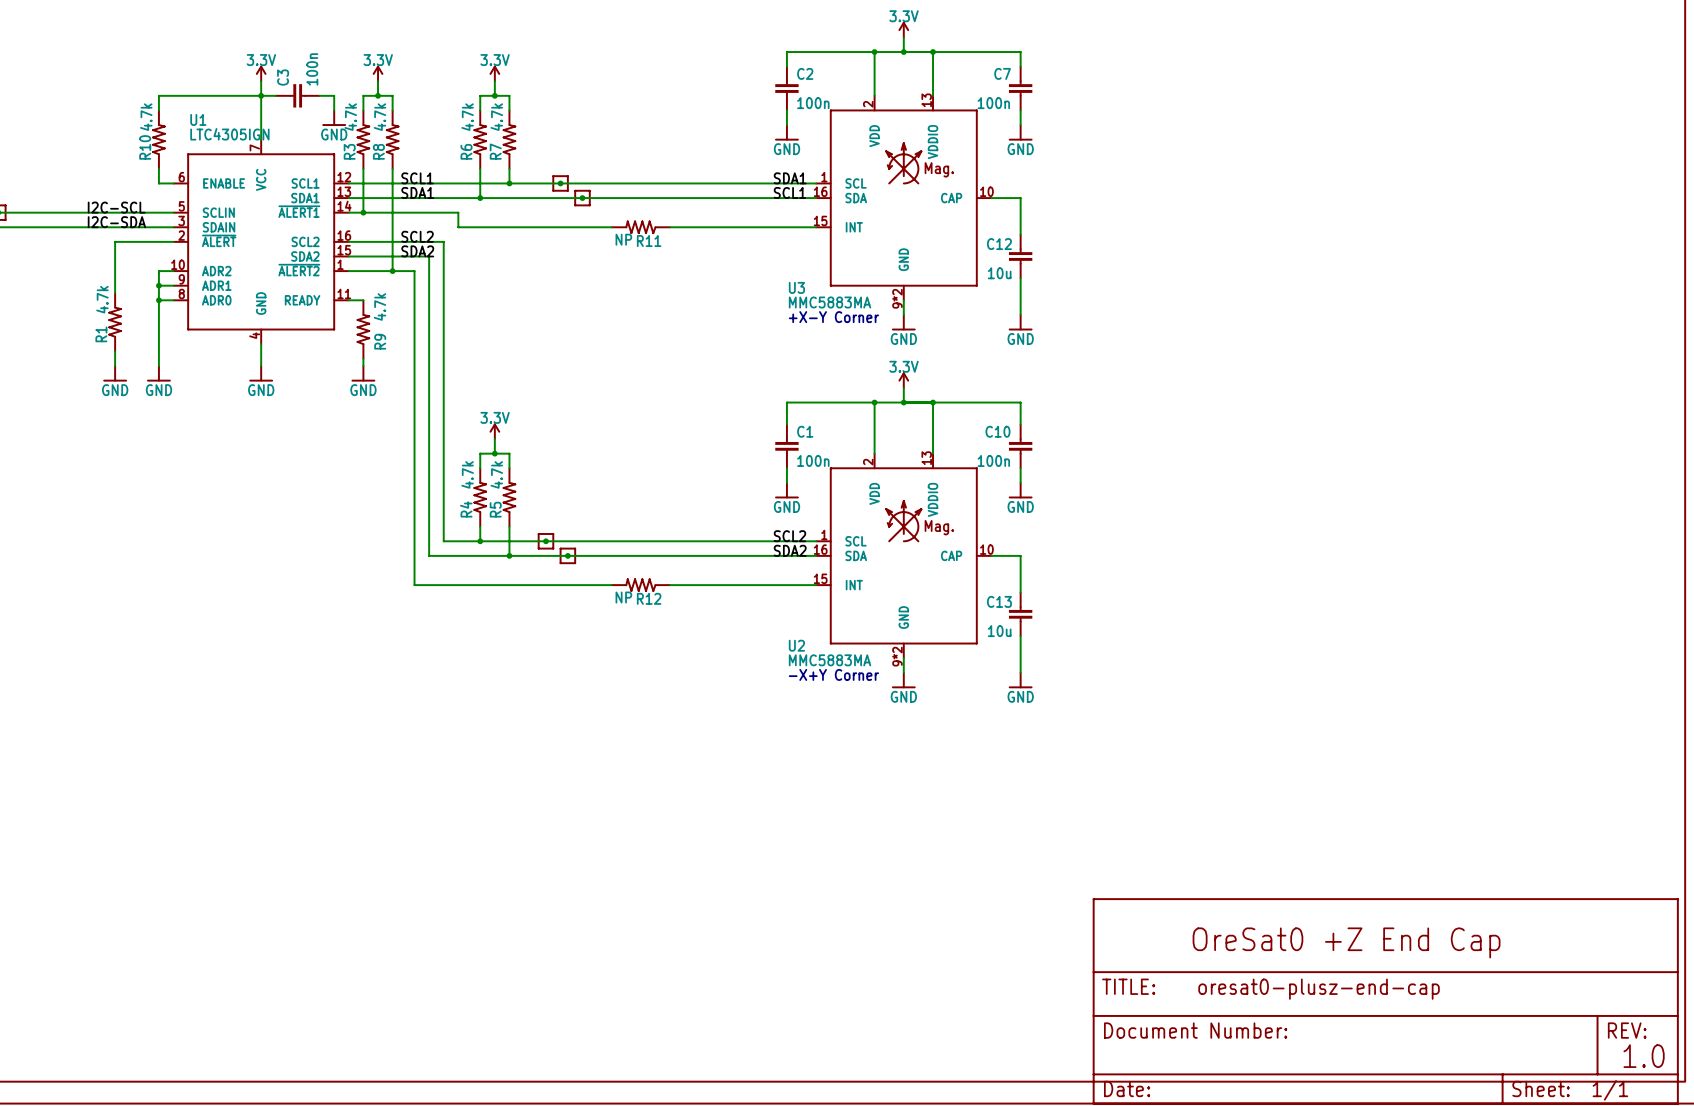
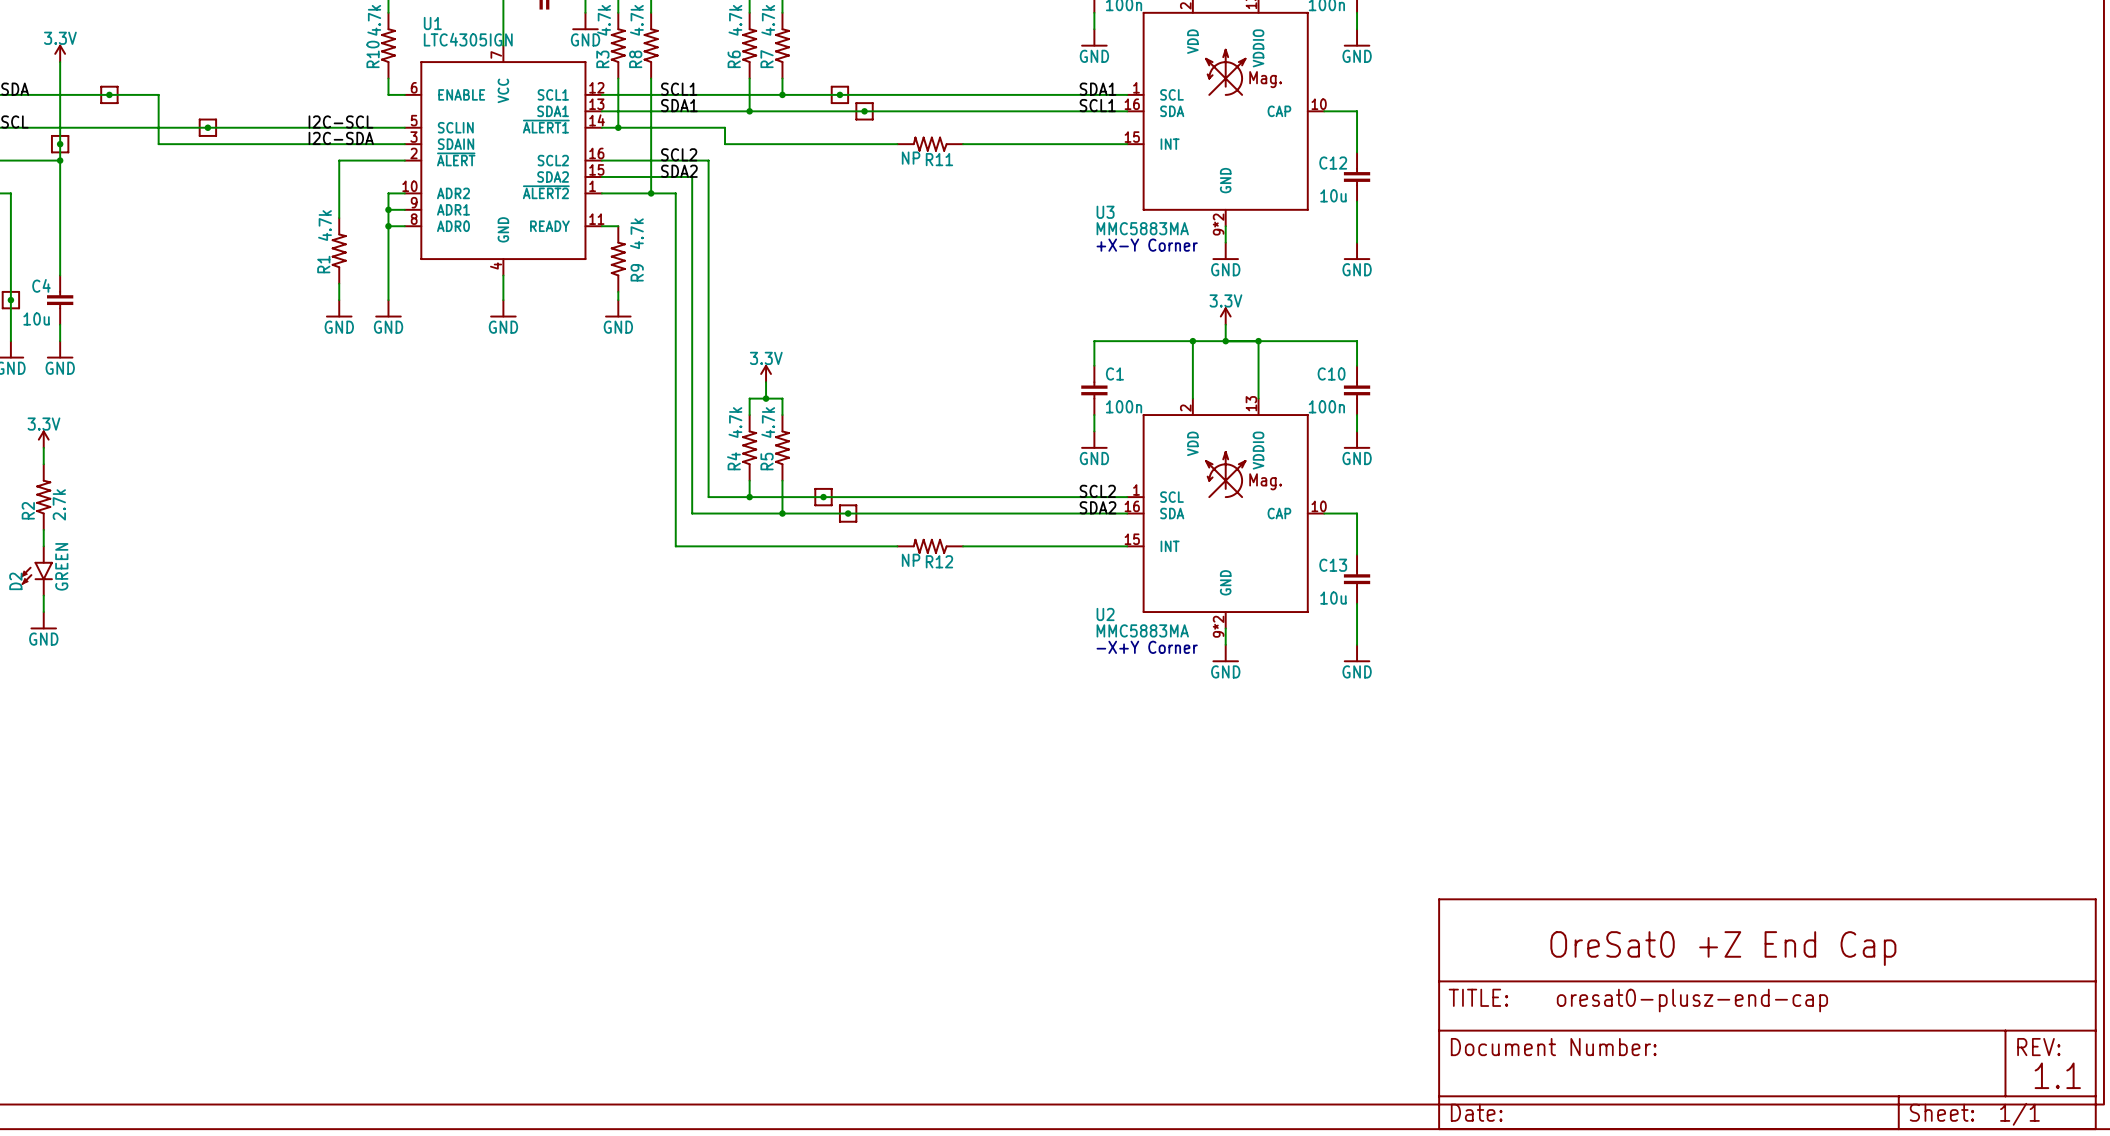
text: 1.0 (1644, 1056) -> 1.1 (2057, 1075)

